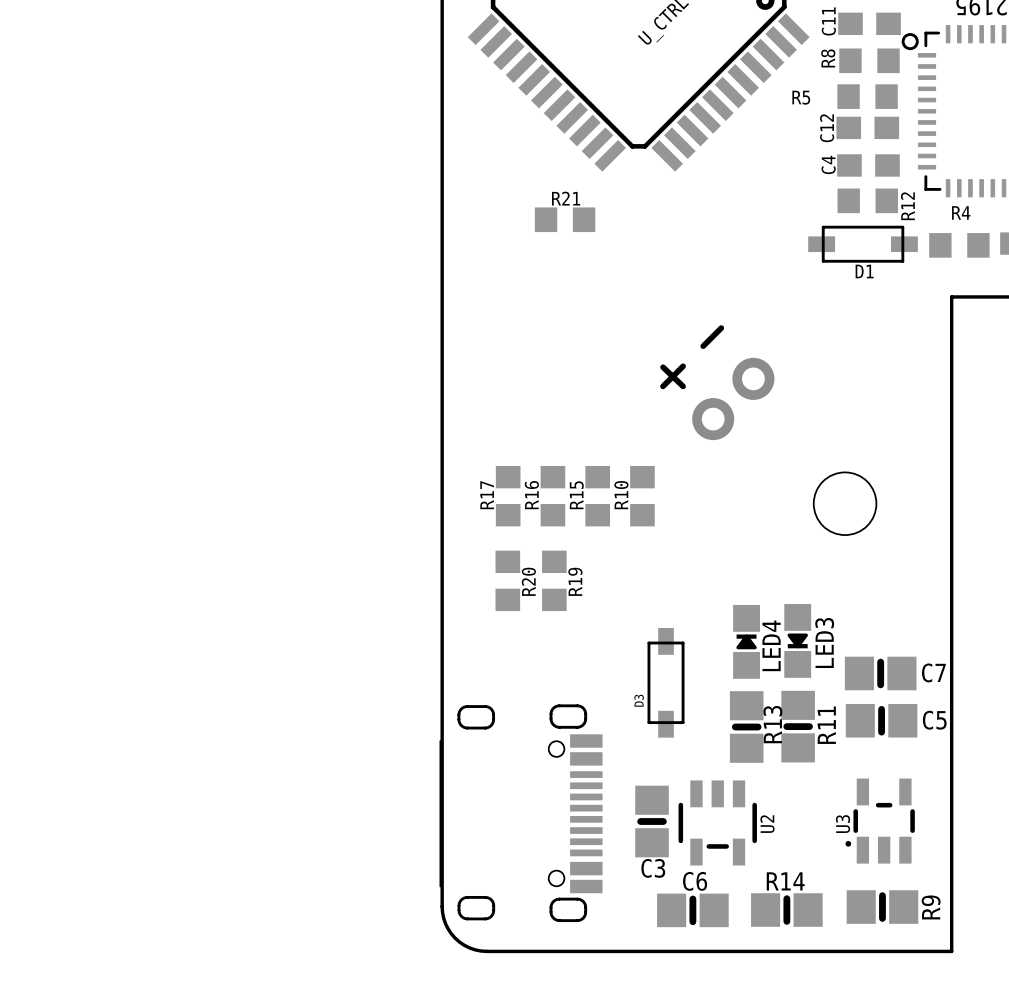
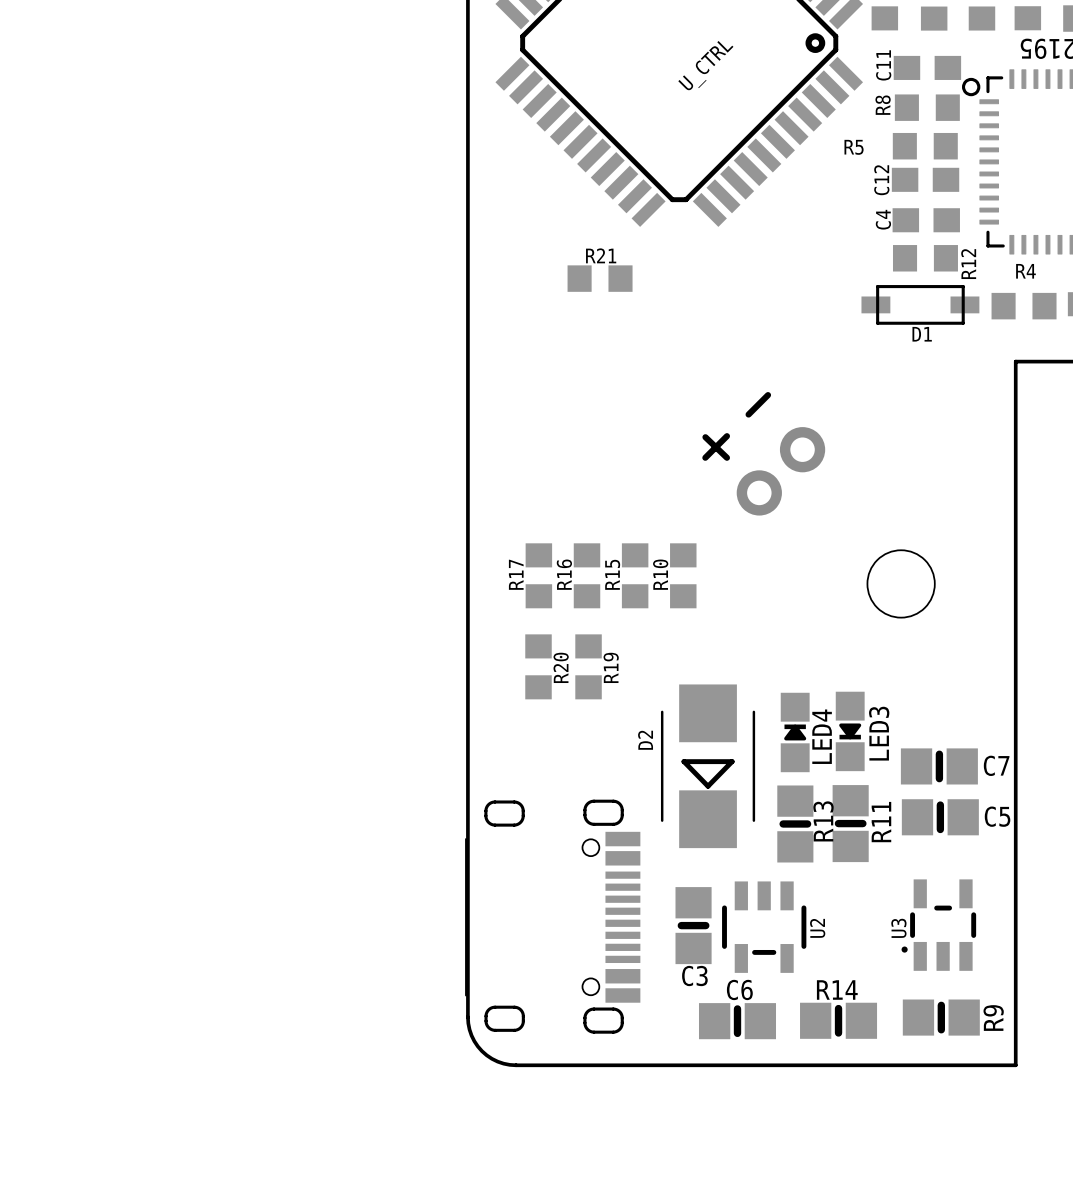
D2: none -> (708, 766)
D3: (666, 682) -> none

